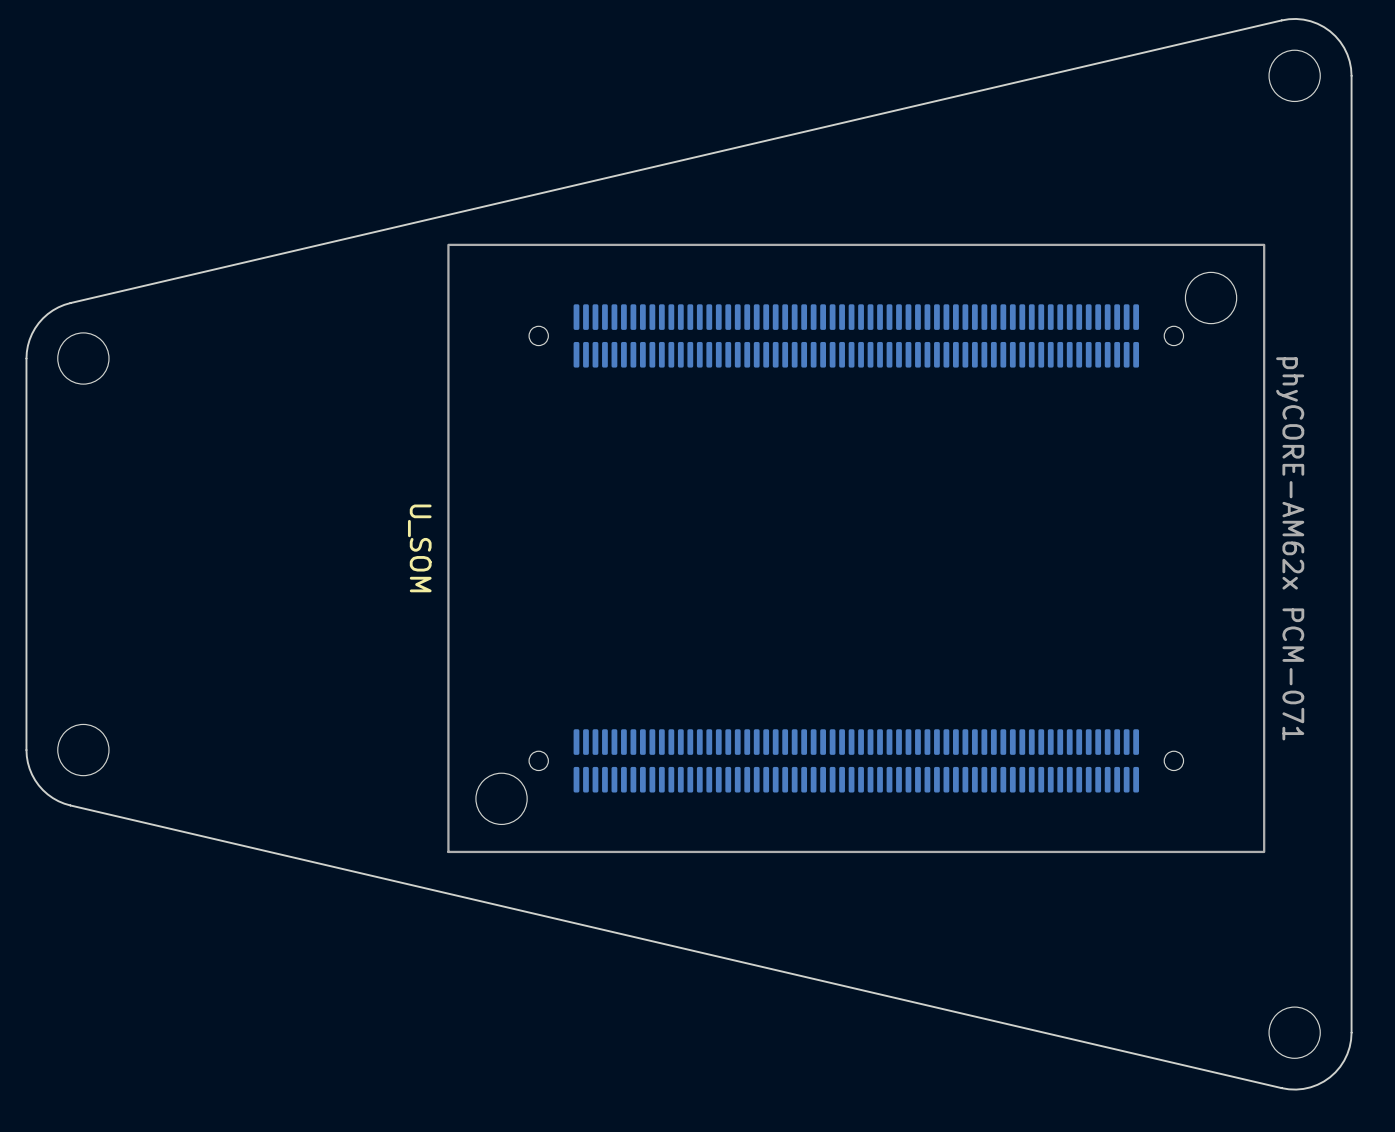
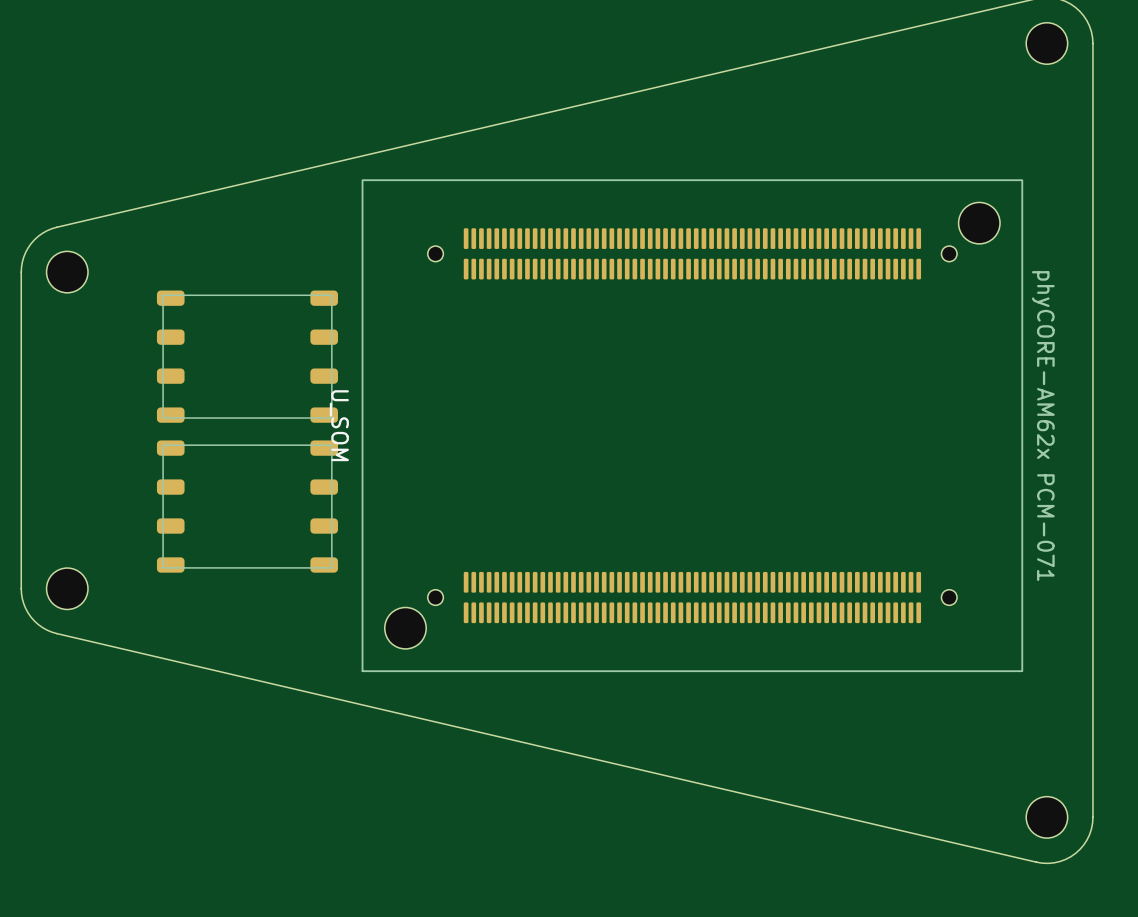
part: none -> (247, 356)
part: none -> (247, 506)

